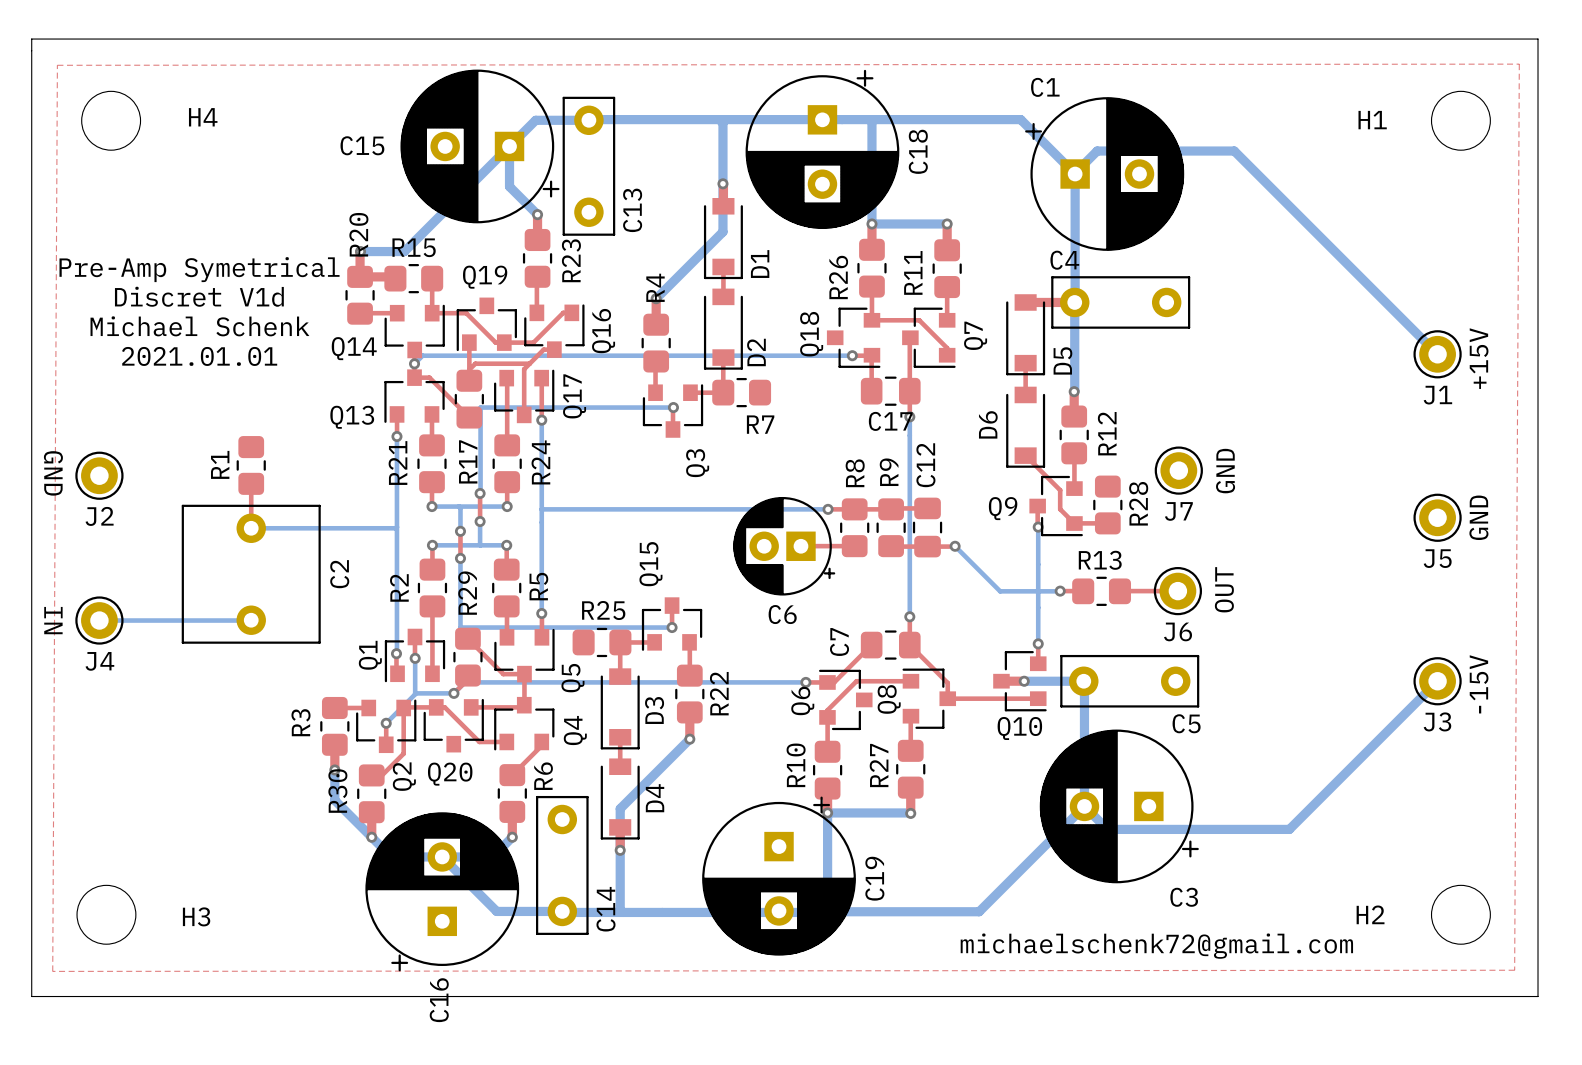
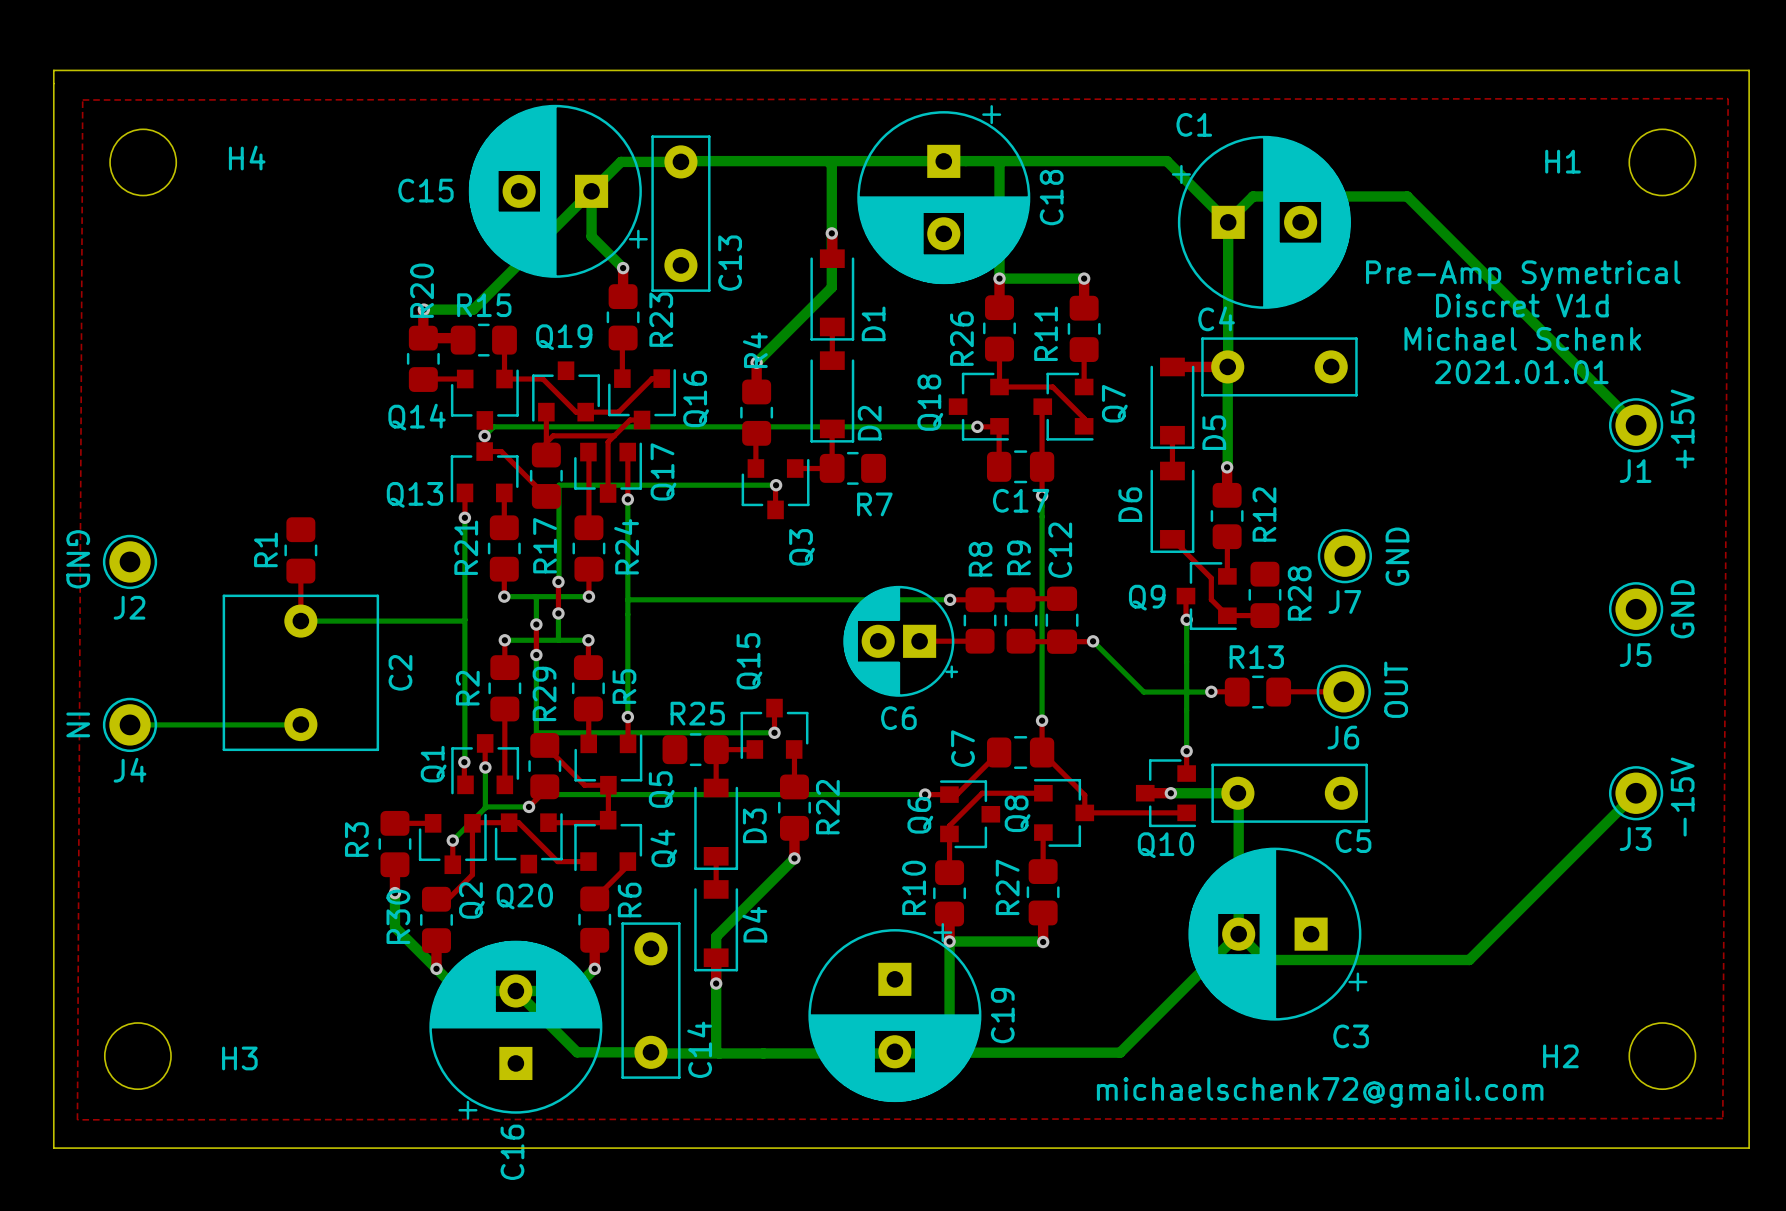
text: none -> Pre-Amp Symetrical (1523, 275)
text: none -> Discret V1d (1522, 305)
text: Pre-Amp Symetrical (199, 269) -> none
text: none -> Michael Schenk (1522, 338)
text: Discret V1d (199, 296) -> none
text: none -> 2021.01.01 (1521, 372)
text: Michael Schenk (199, 326) -> none
text: 2021.01.01 (199, 356) -> none

